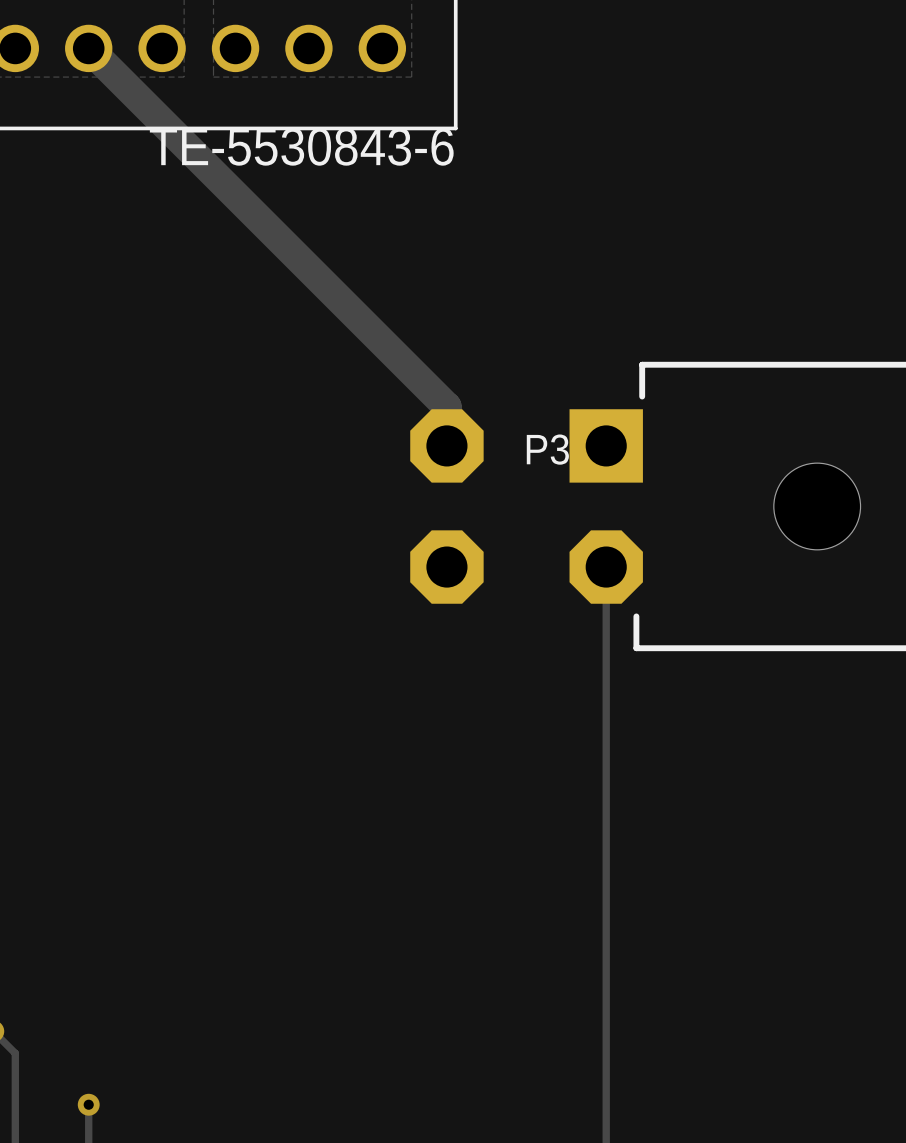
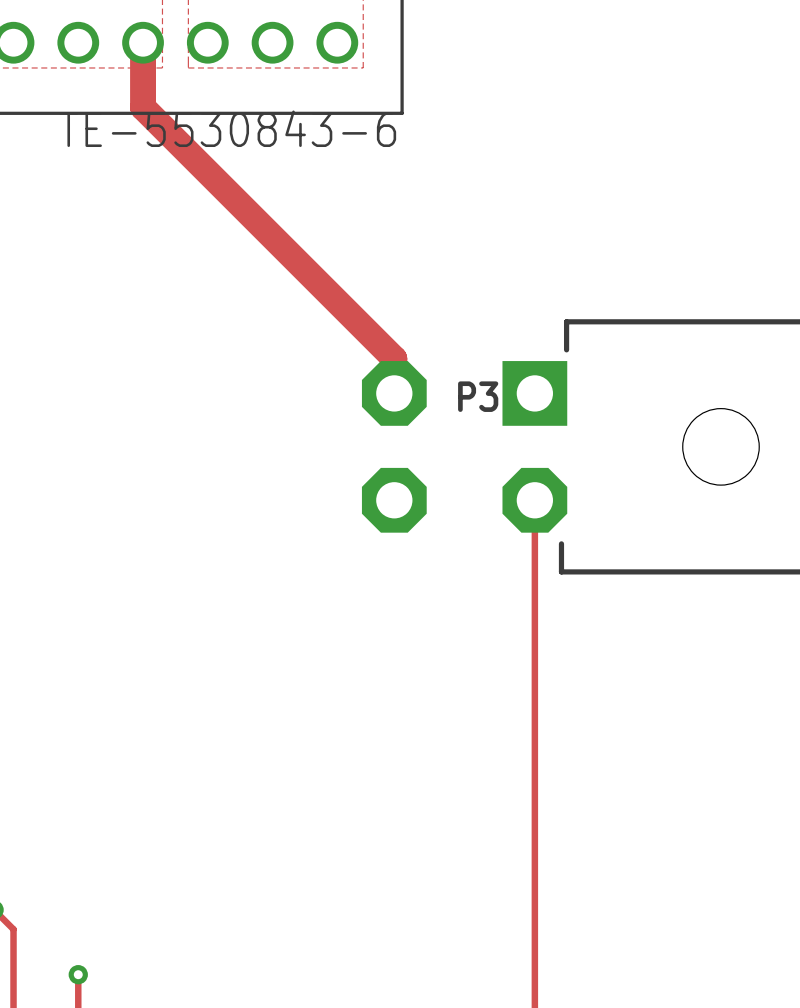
track: (88, 48) (162, 121) -> (143, 42) (143, 107)

